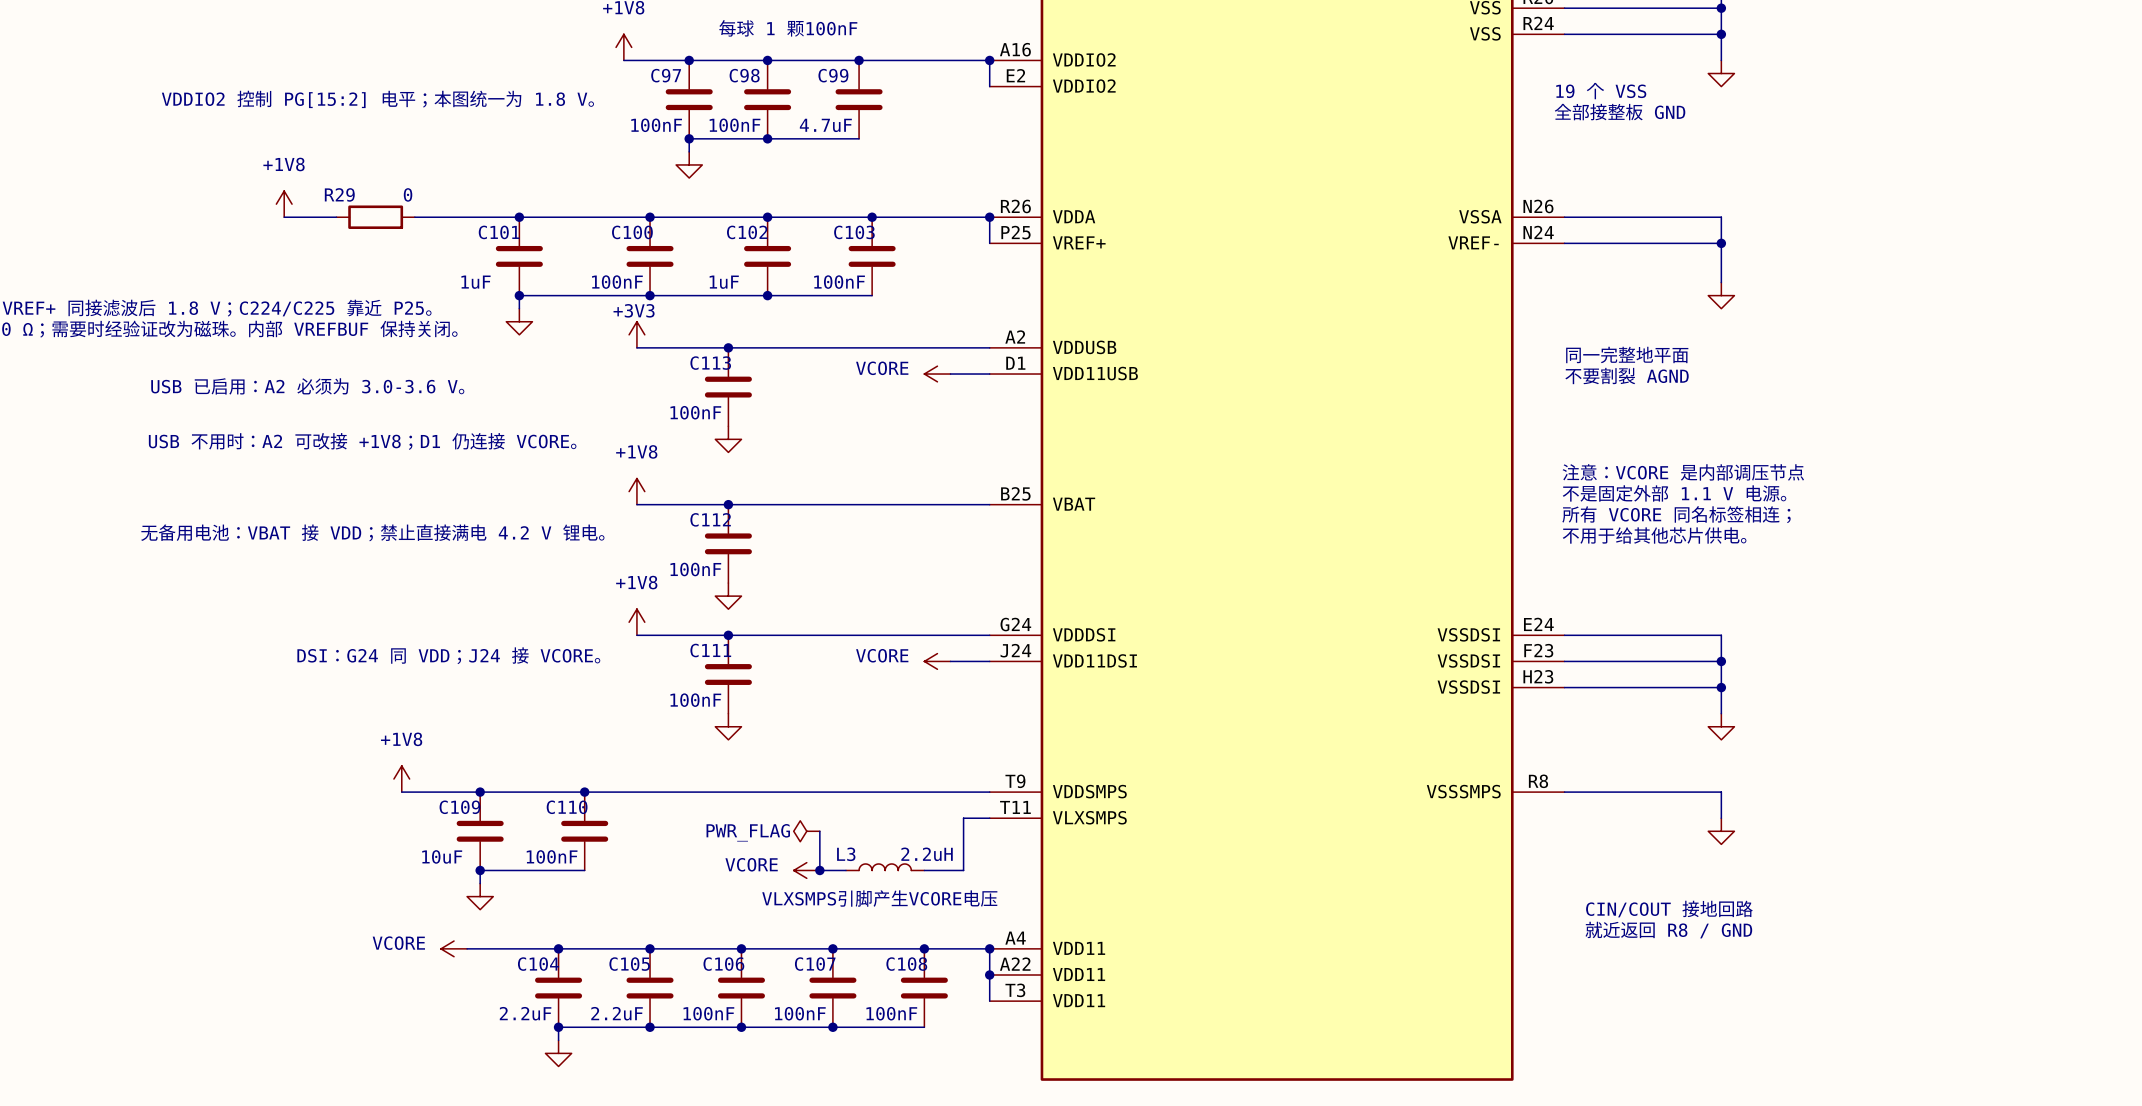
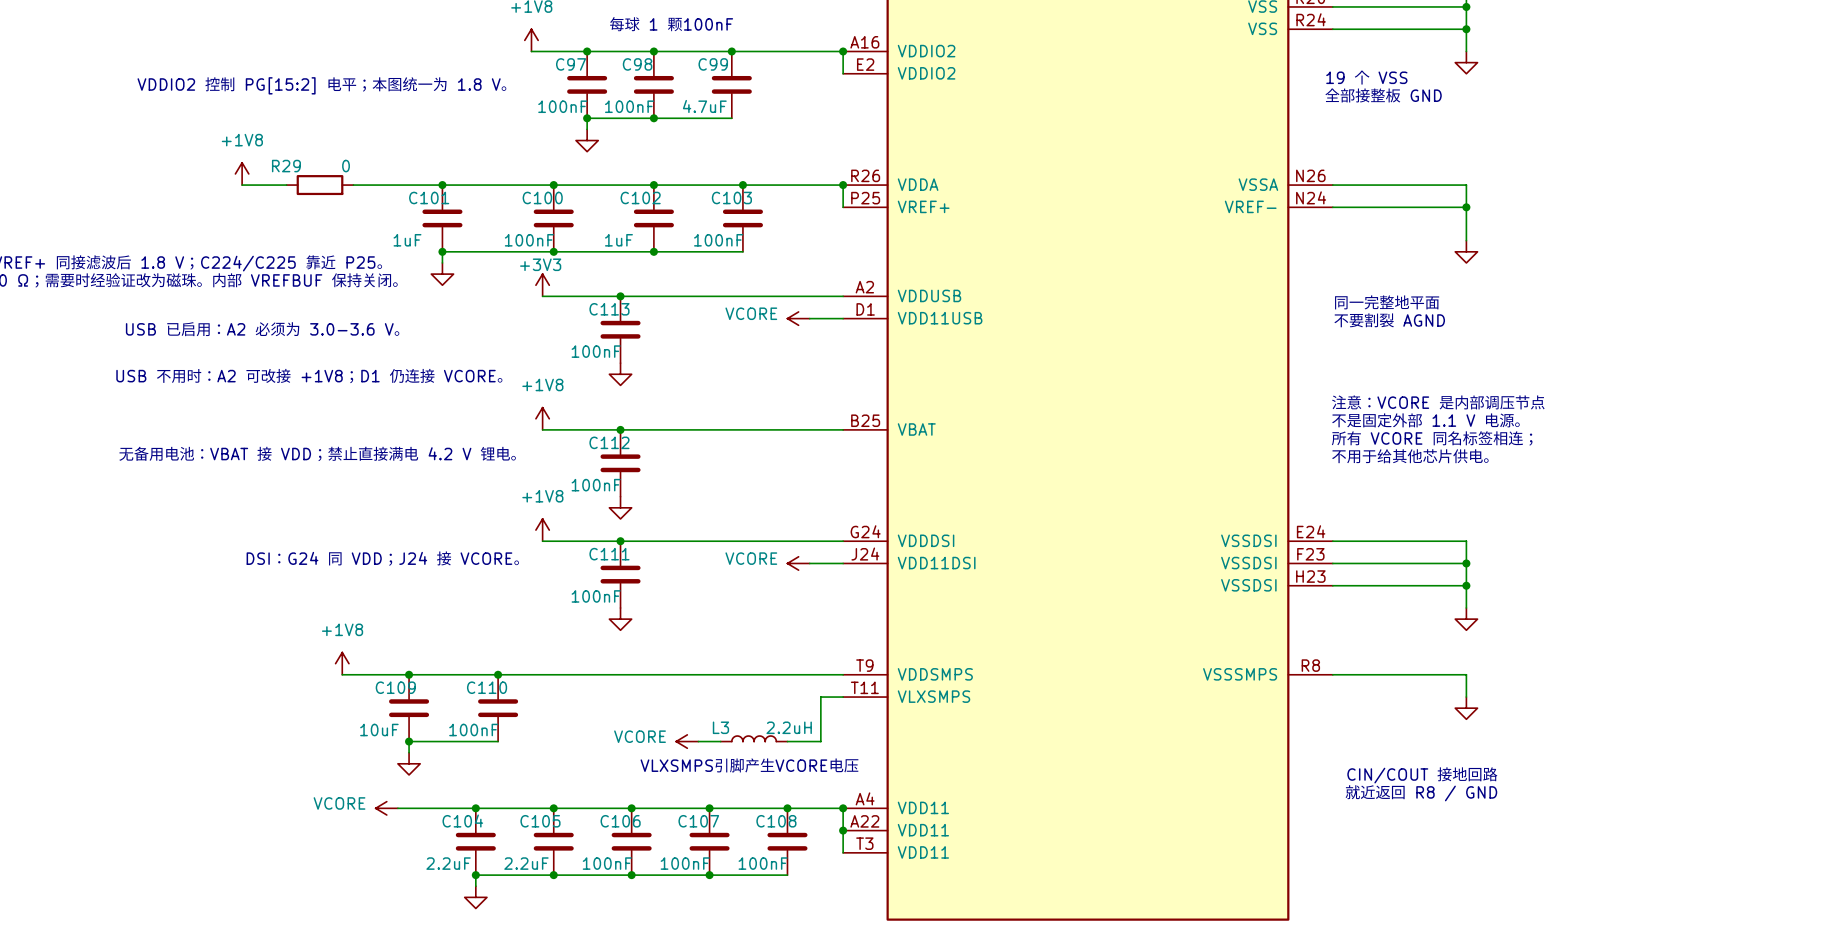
power symbol: PWR_FLAG (806, 831) -> none
wire: (819, 831) (819, 870) -> none
junction: (819, 870) -> none

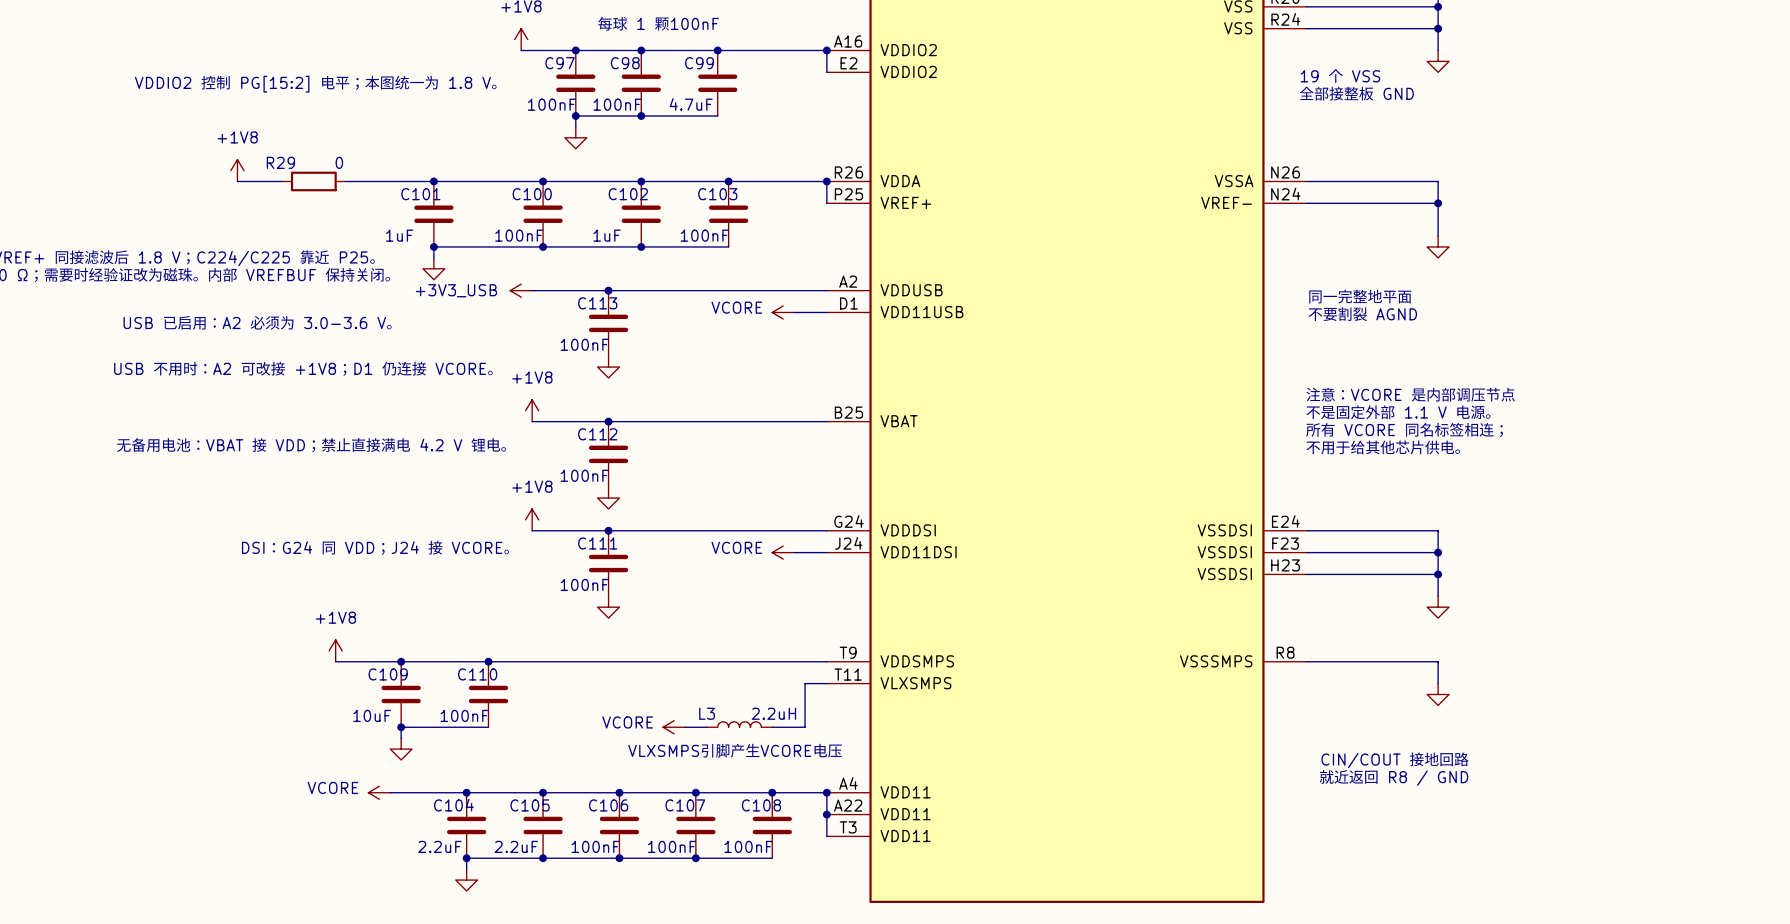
power symbol: +3V3 (542, 285) -> none
power symbol: none -> +3V3_USB (521, 290)

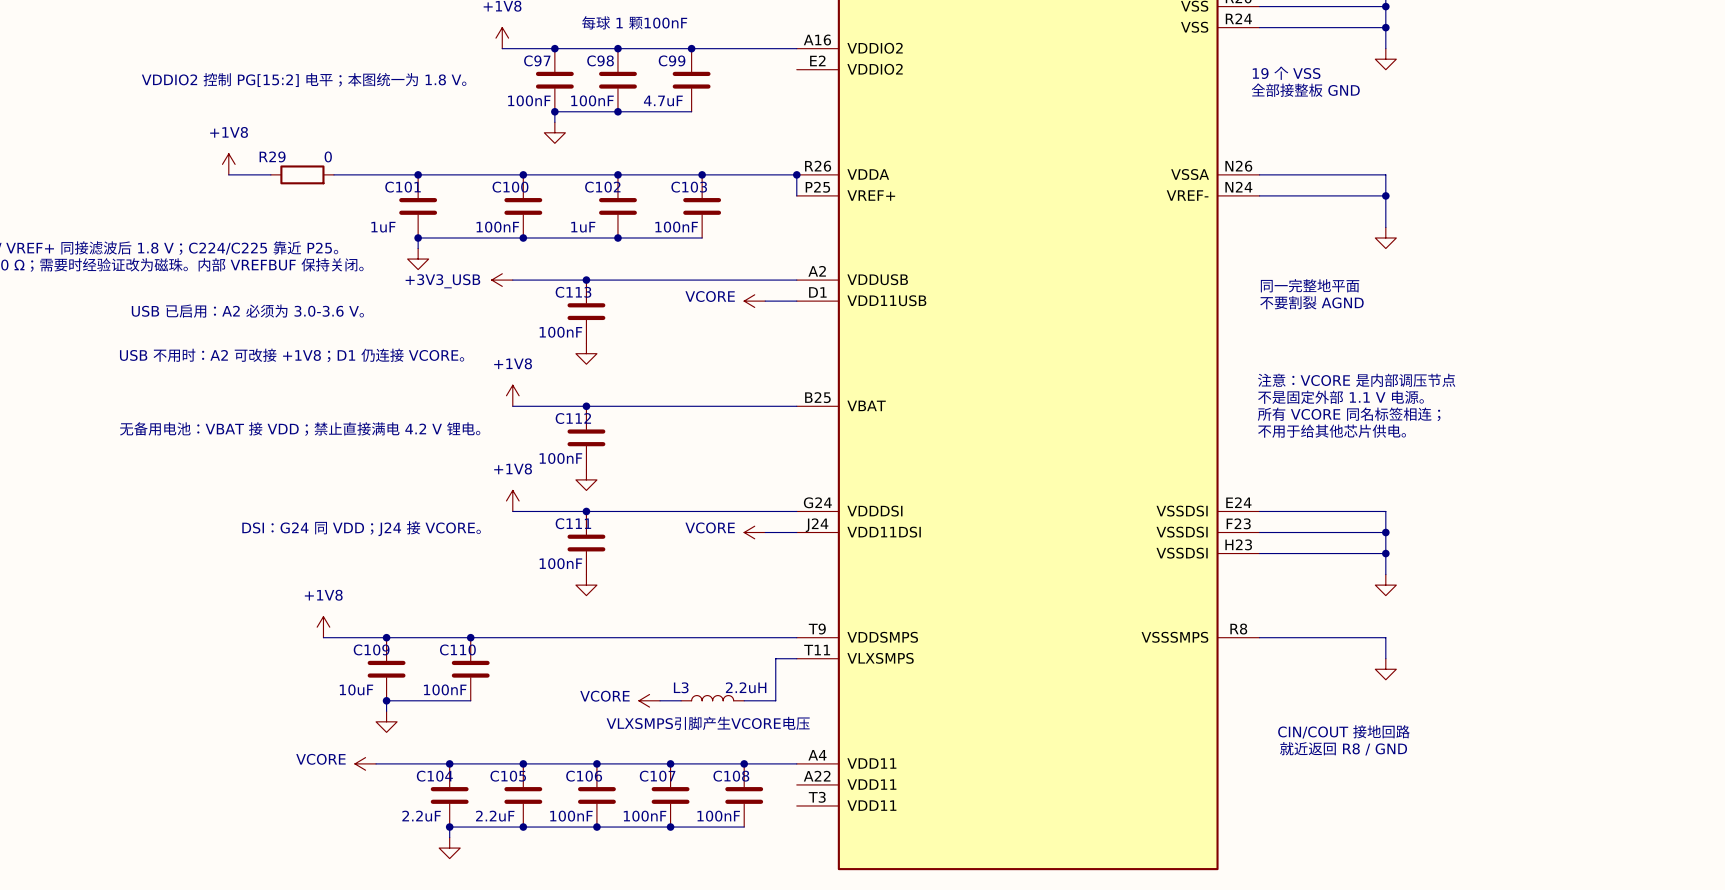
wire: (826, 50) (826, 72) -> none
junction: (826, 50) -> none
wire: (826, 792) (826, 836) -> none
junction: (826, 792) -> none
junction: (826, 814) -> none

